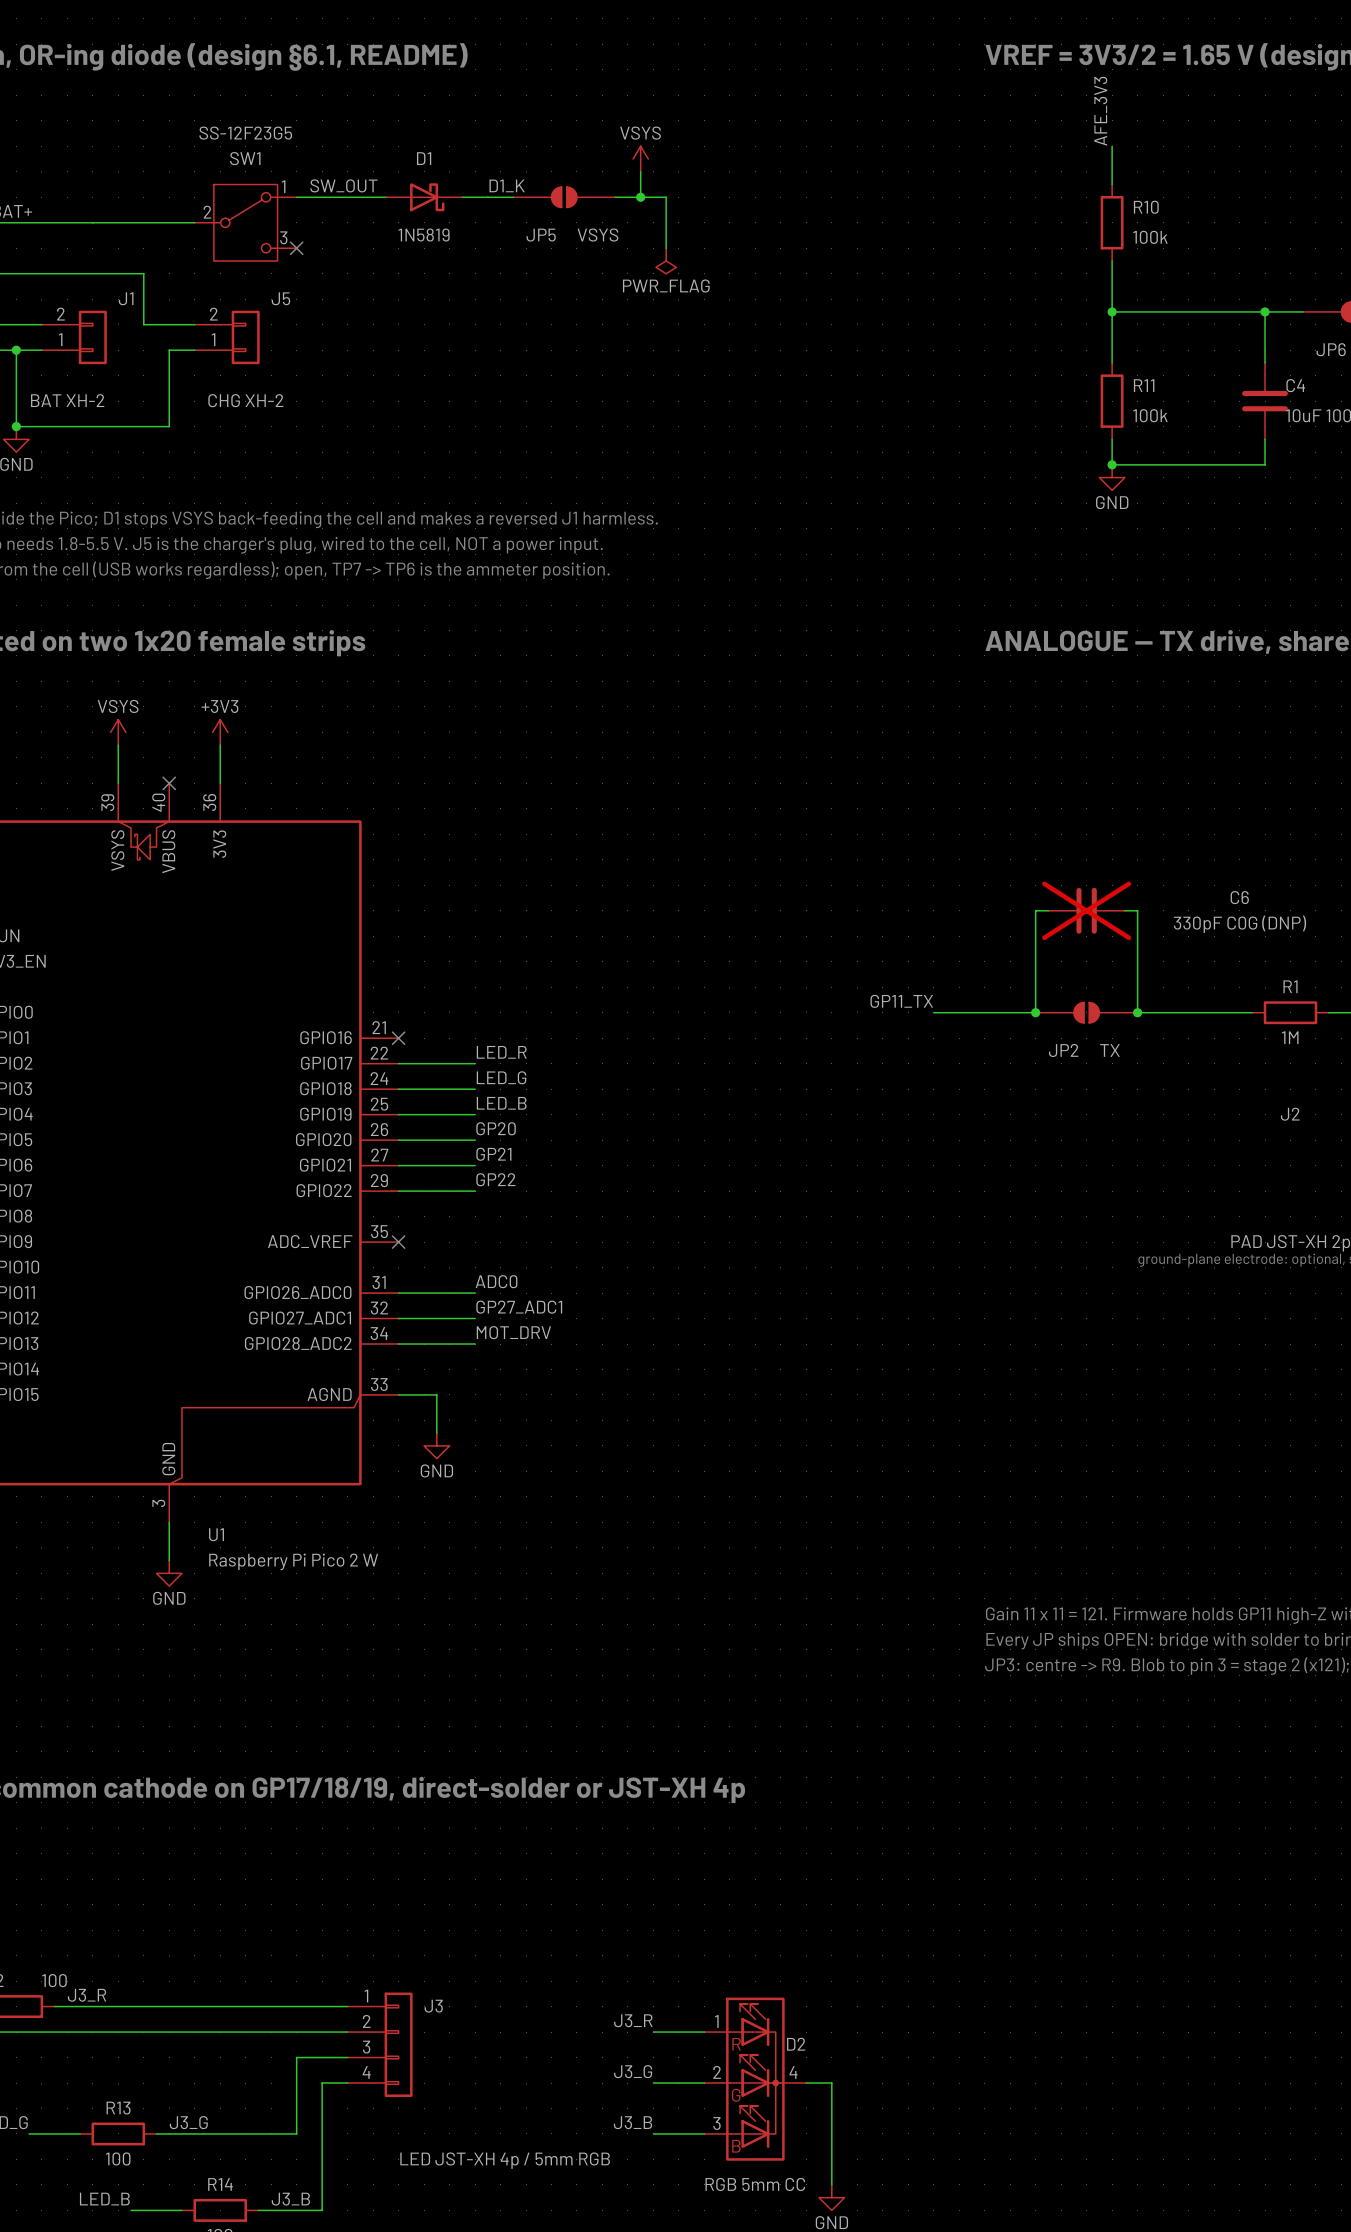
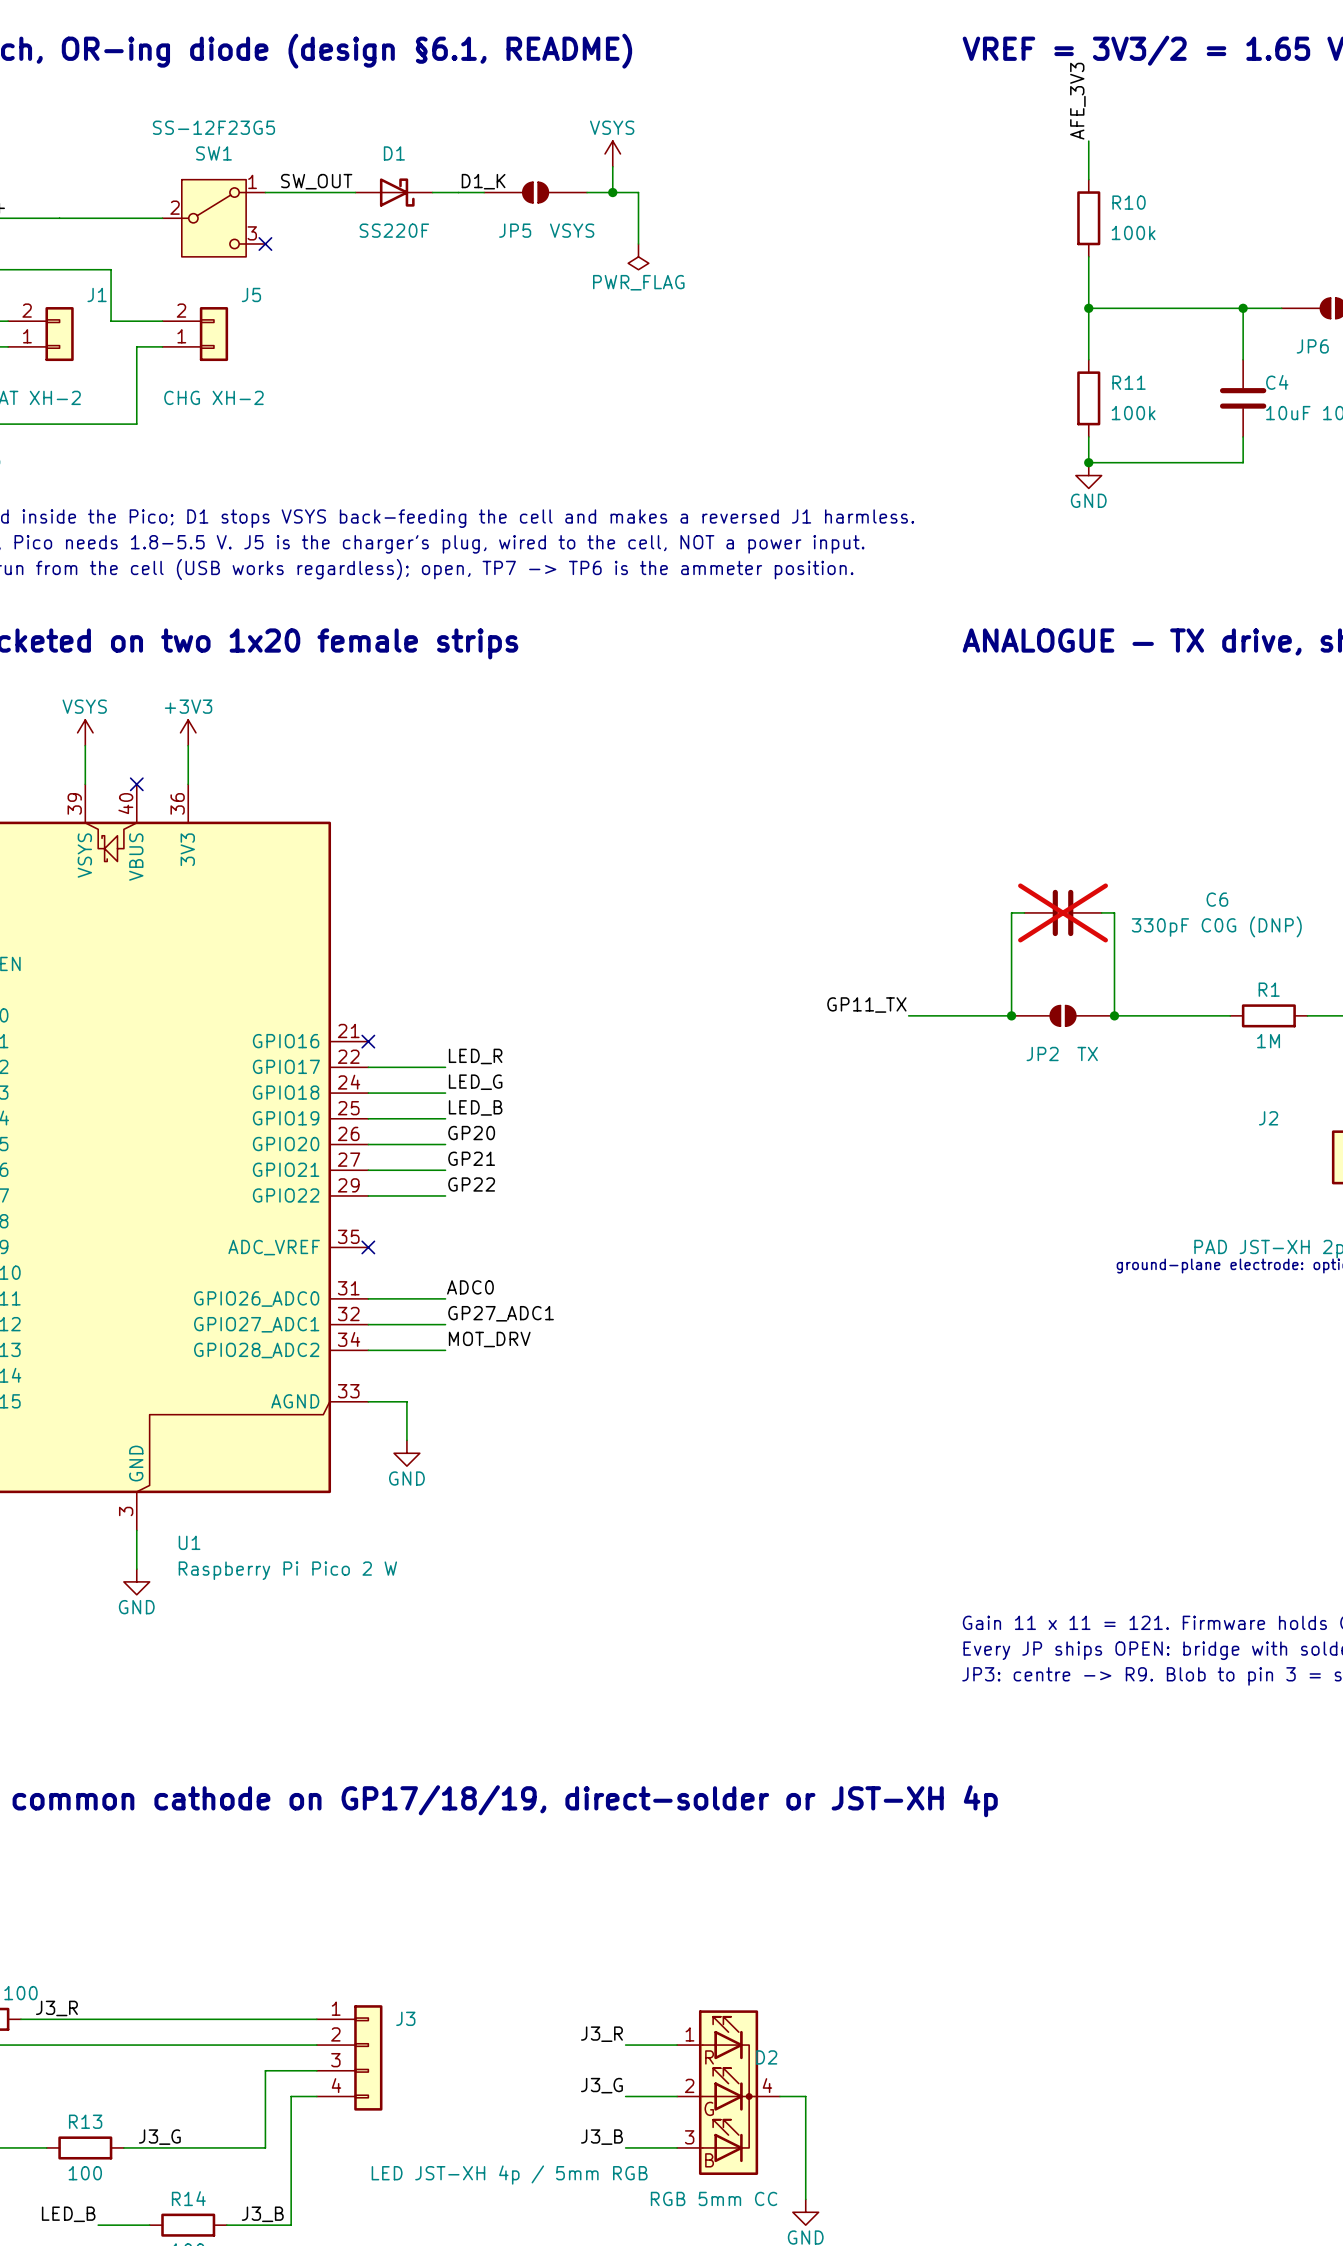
D1 value: 1N5819 (424, 235) -> SS220F (394, 230)

